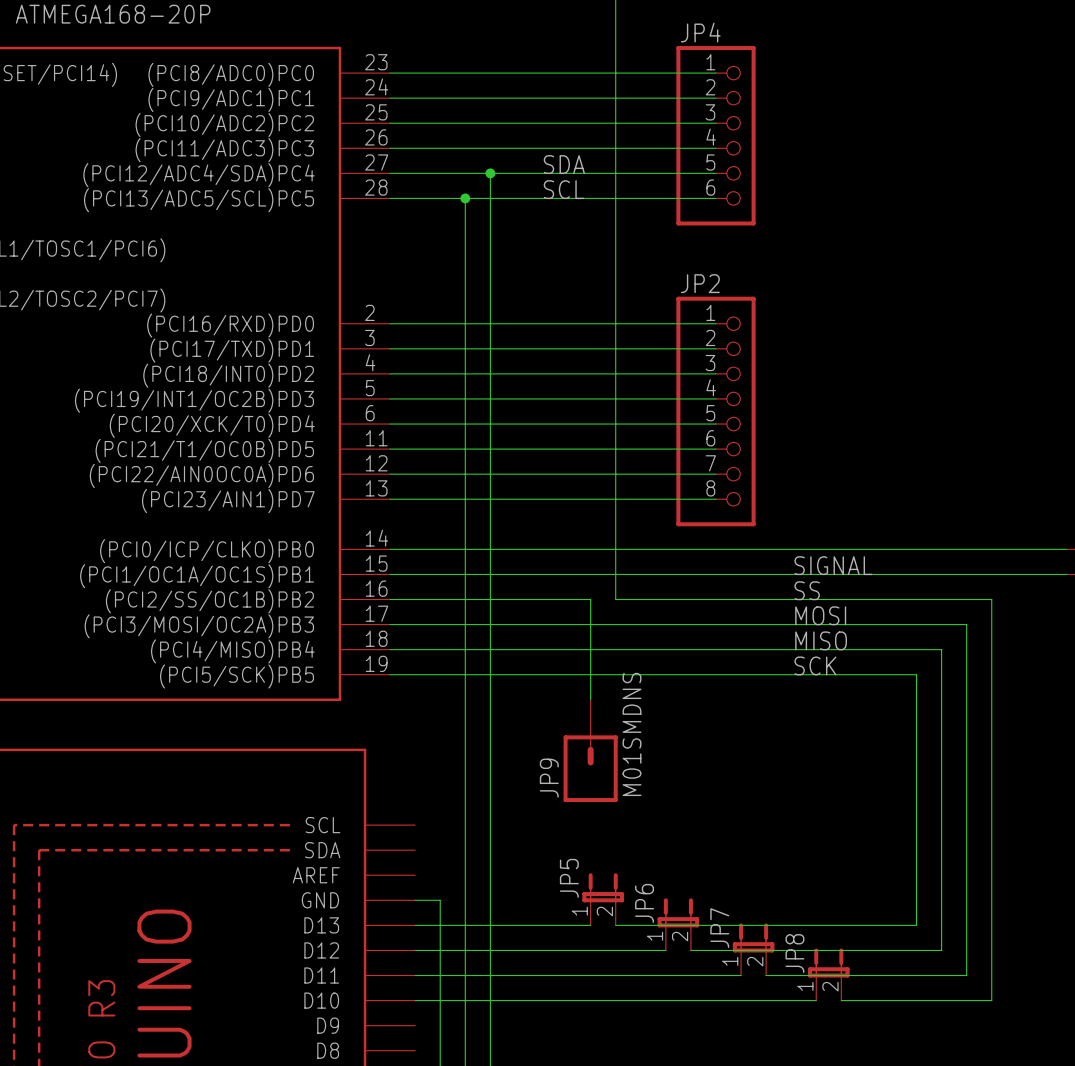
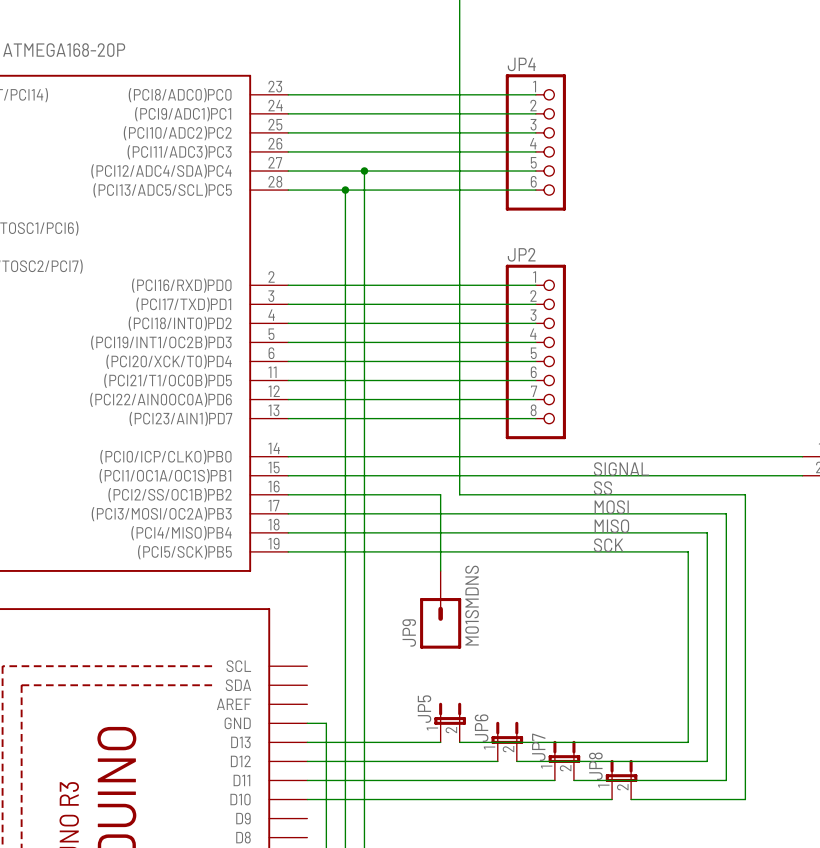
label: SDA (564, 164) -> none
label: SCL (564, 189) -> none

